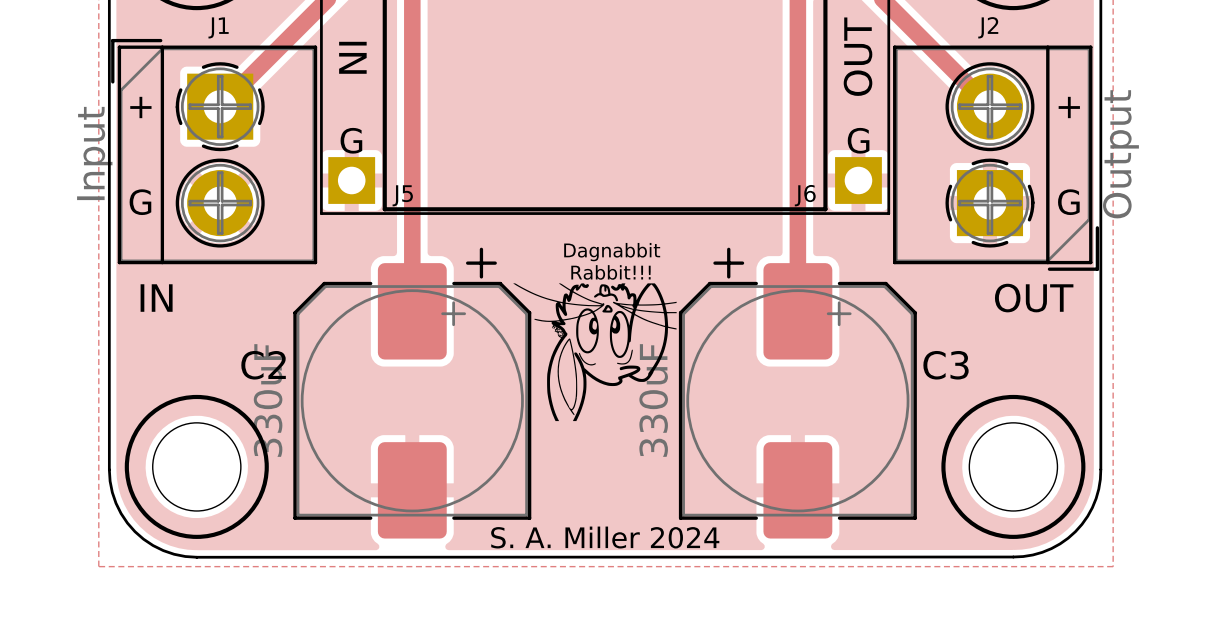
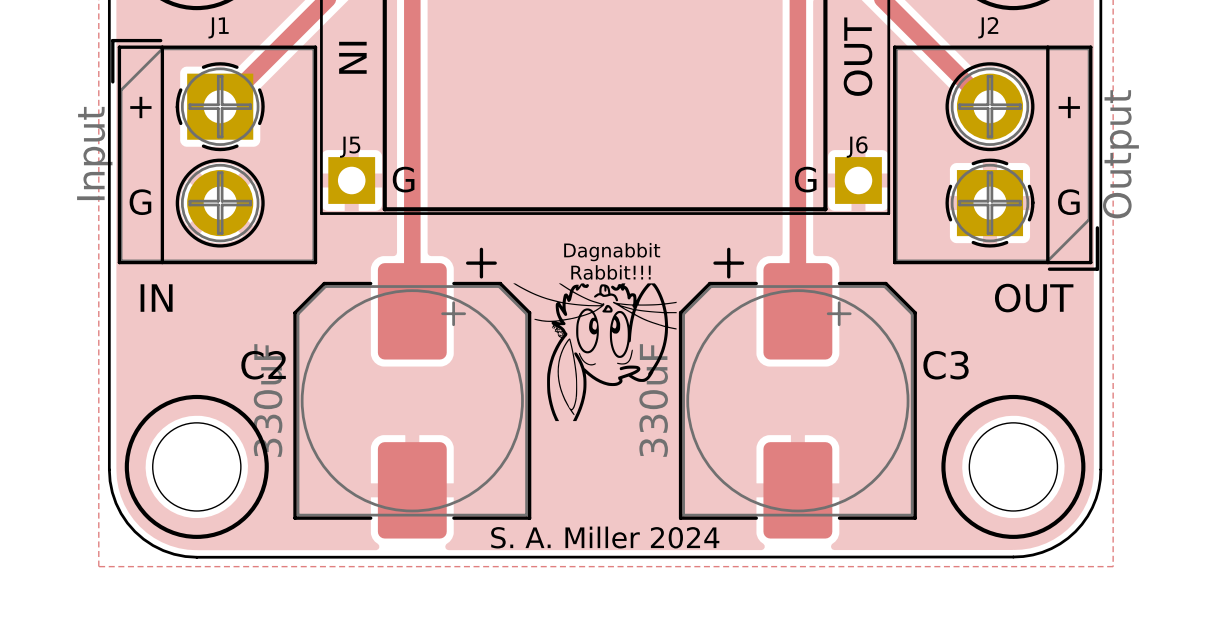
text position: G (351, 140) -> G (403, 179)
text position: G (858, 140) -> G (805, 179)
J5 name position: J5 (402, 195) -> J5 (350, 147)
J6 name position: J6 (805, 195) -> J6 (857, 147)

